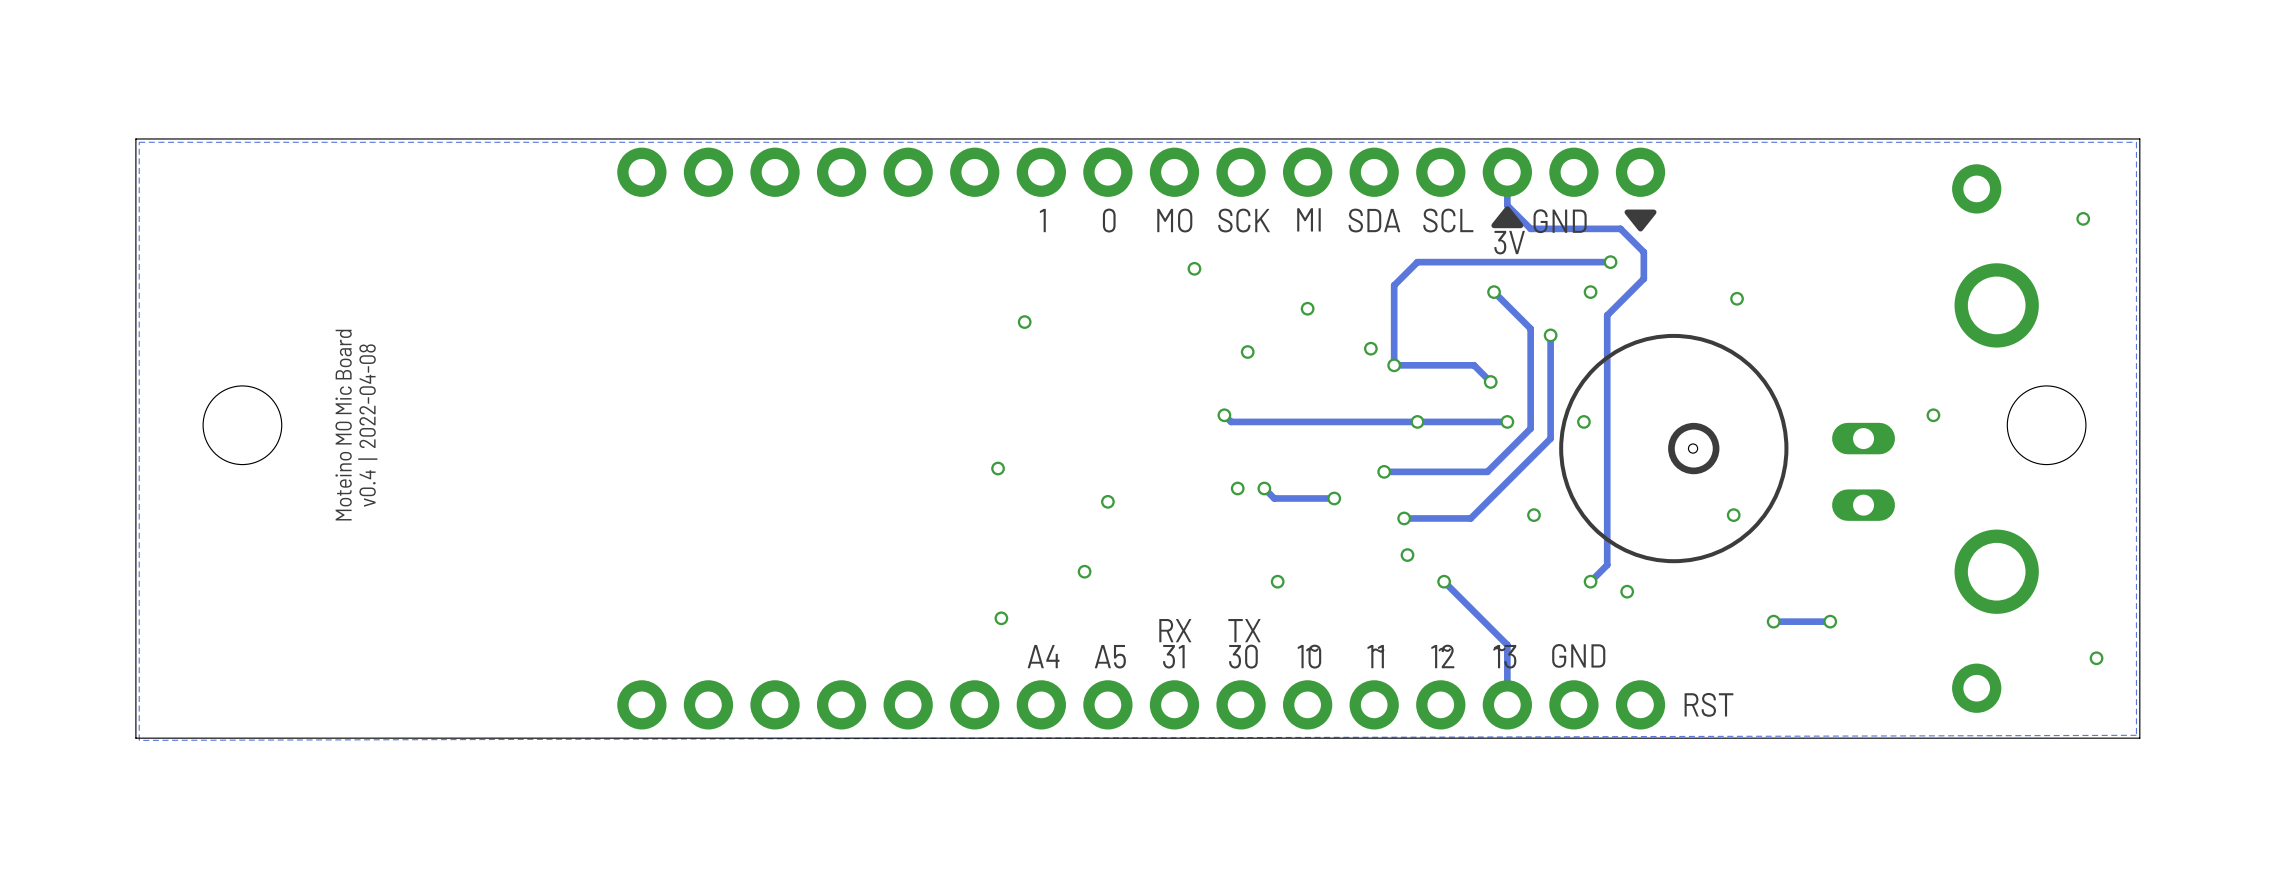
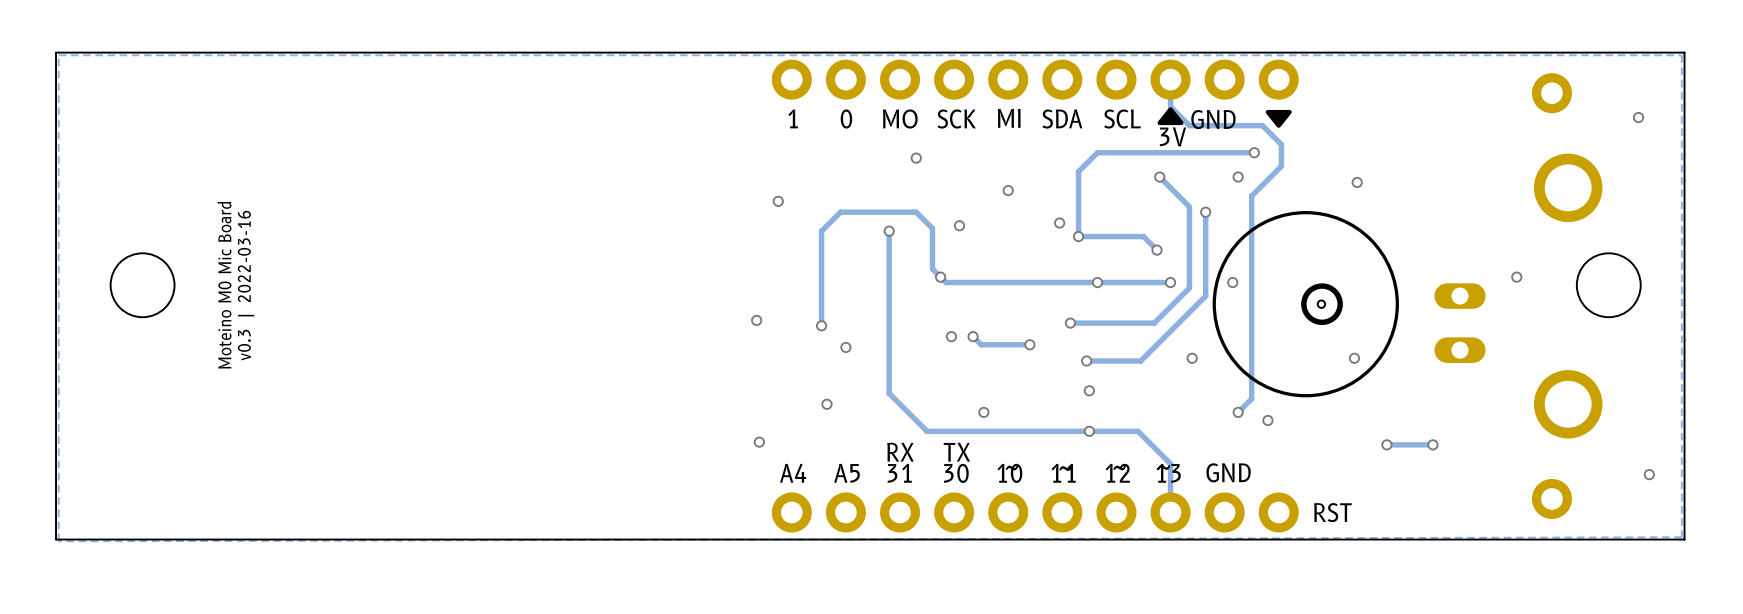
part: (1141, 172) -> none
via: none -> (889, 231)
track: none -> (940, 277) (932, 269) (932, 228) (916, 212) (840, 212) (821, 231) (821, 325)
text: v0.4 | 2022-04-08 (367, 425) -> v0.3 | 2022-03-16 (246, 285)
via: none -> (821, 325)
track: (1444, 581) (1467, 605) -> (889, 231) (889, 393) (927, 431) (1138, 431)
via position: (1444, 581) -> (1089, 431)
part: (1141, 704) -> none

